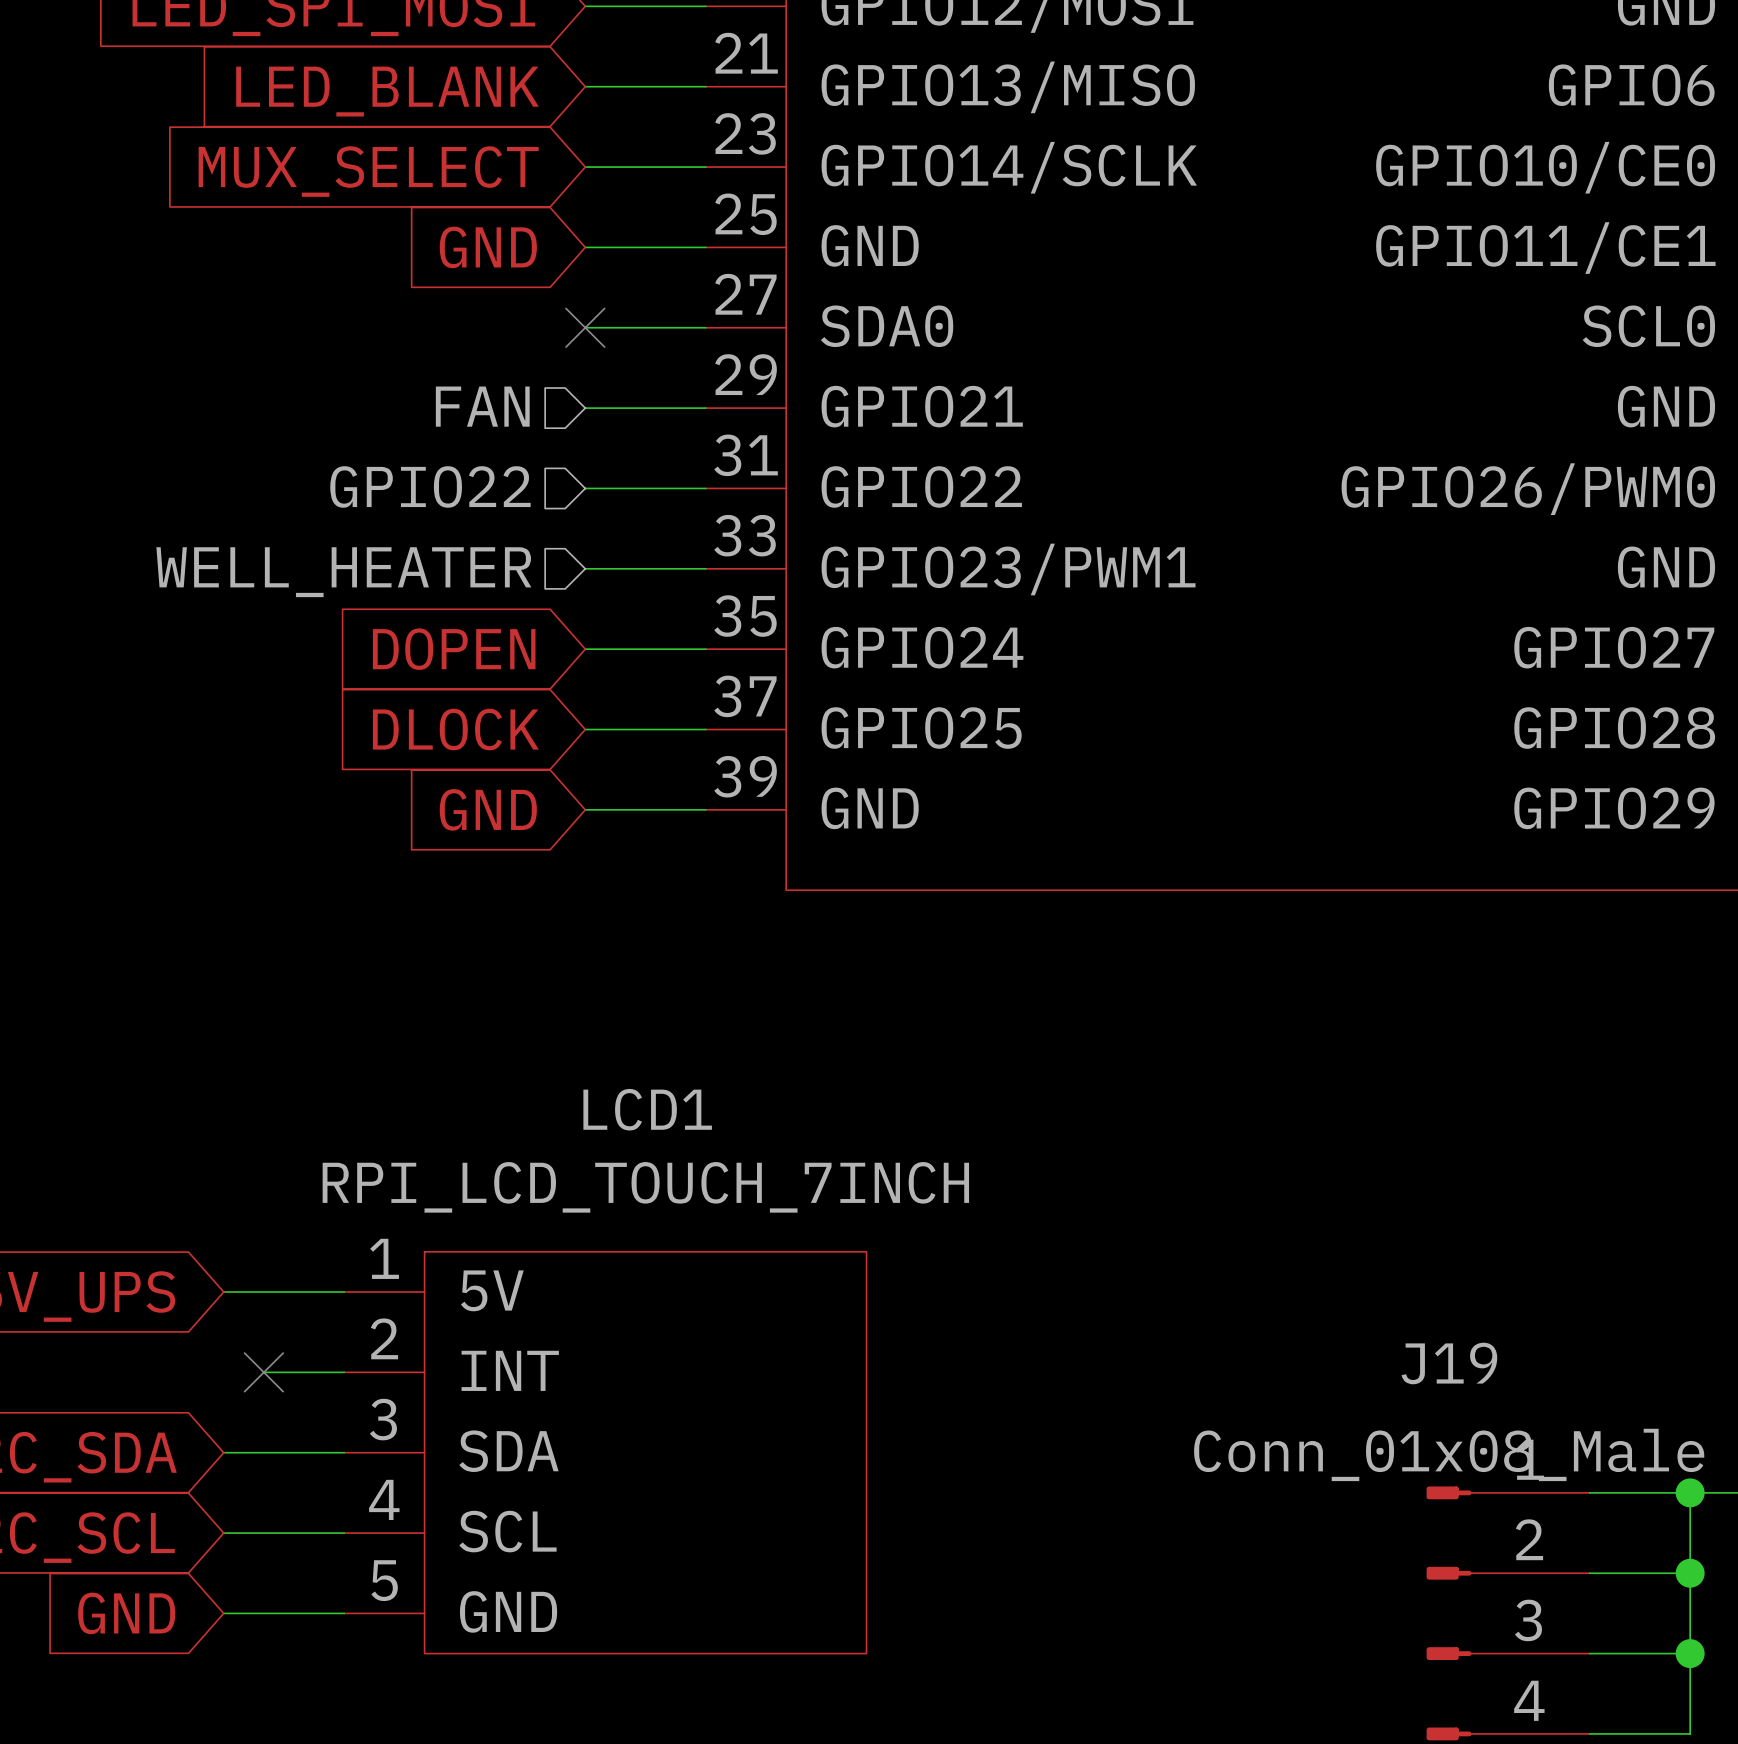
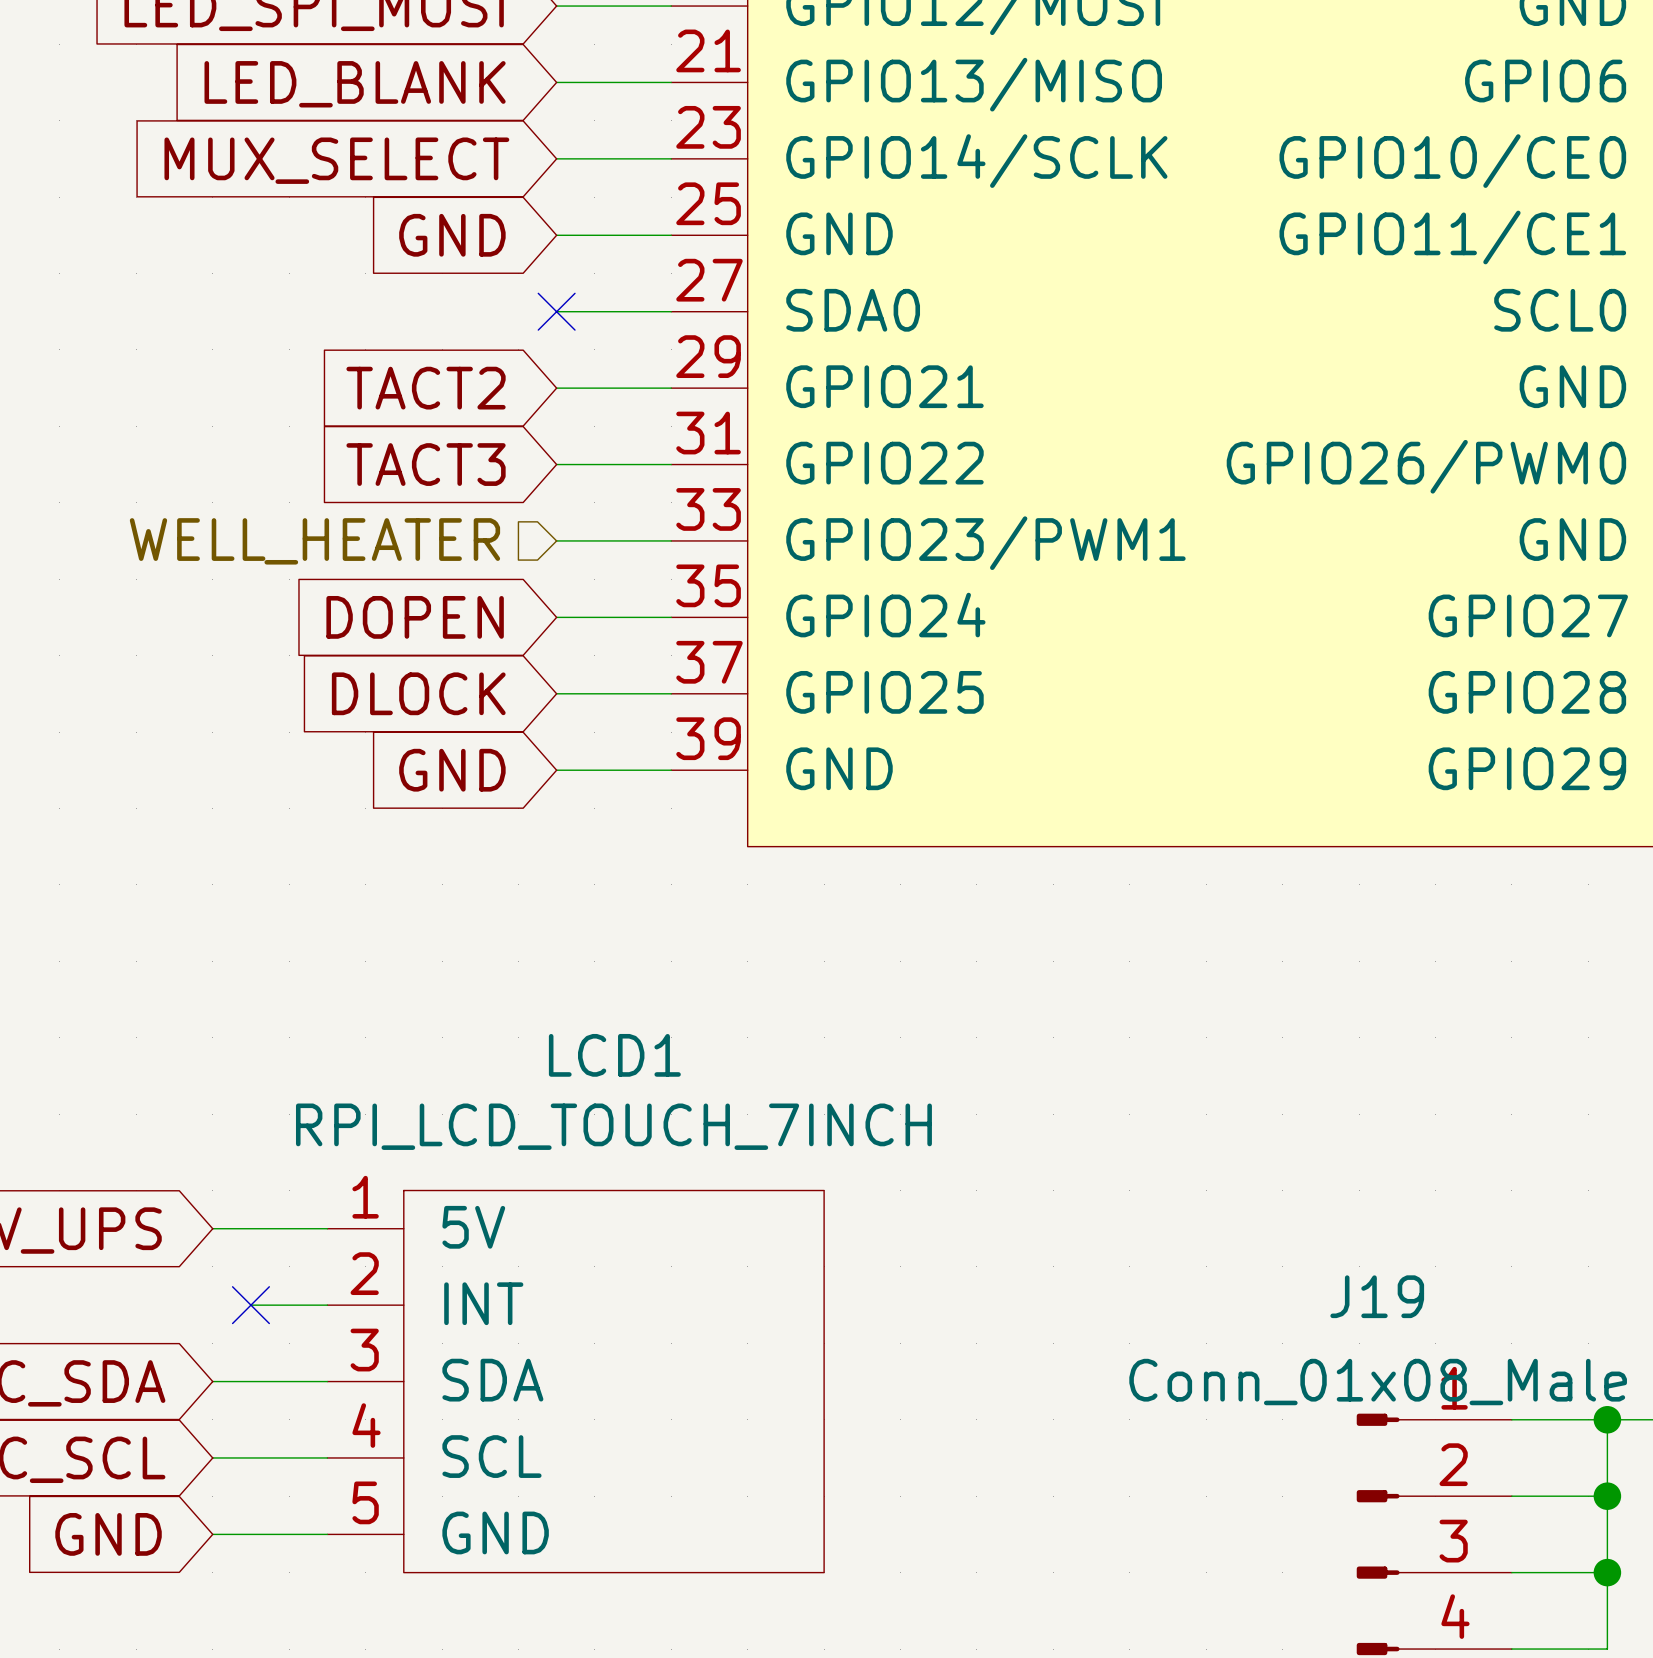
hierarchical label: FAN (482, 406) -> none
global label: none -> TACT2 (426, 388)
hierarchical label: GPIO22 (430, 486) -> none
global label: none -> TACT3 (426, 464)

